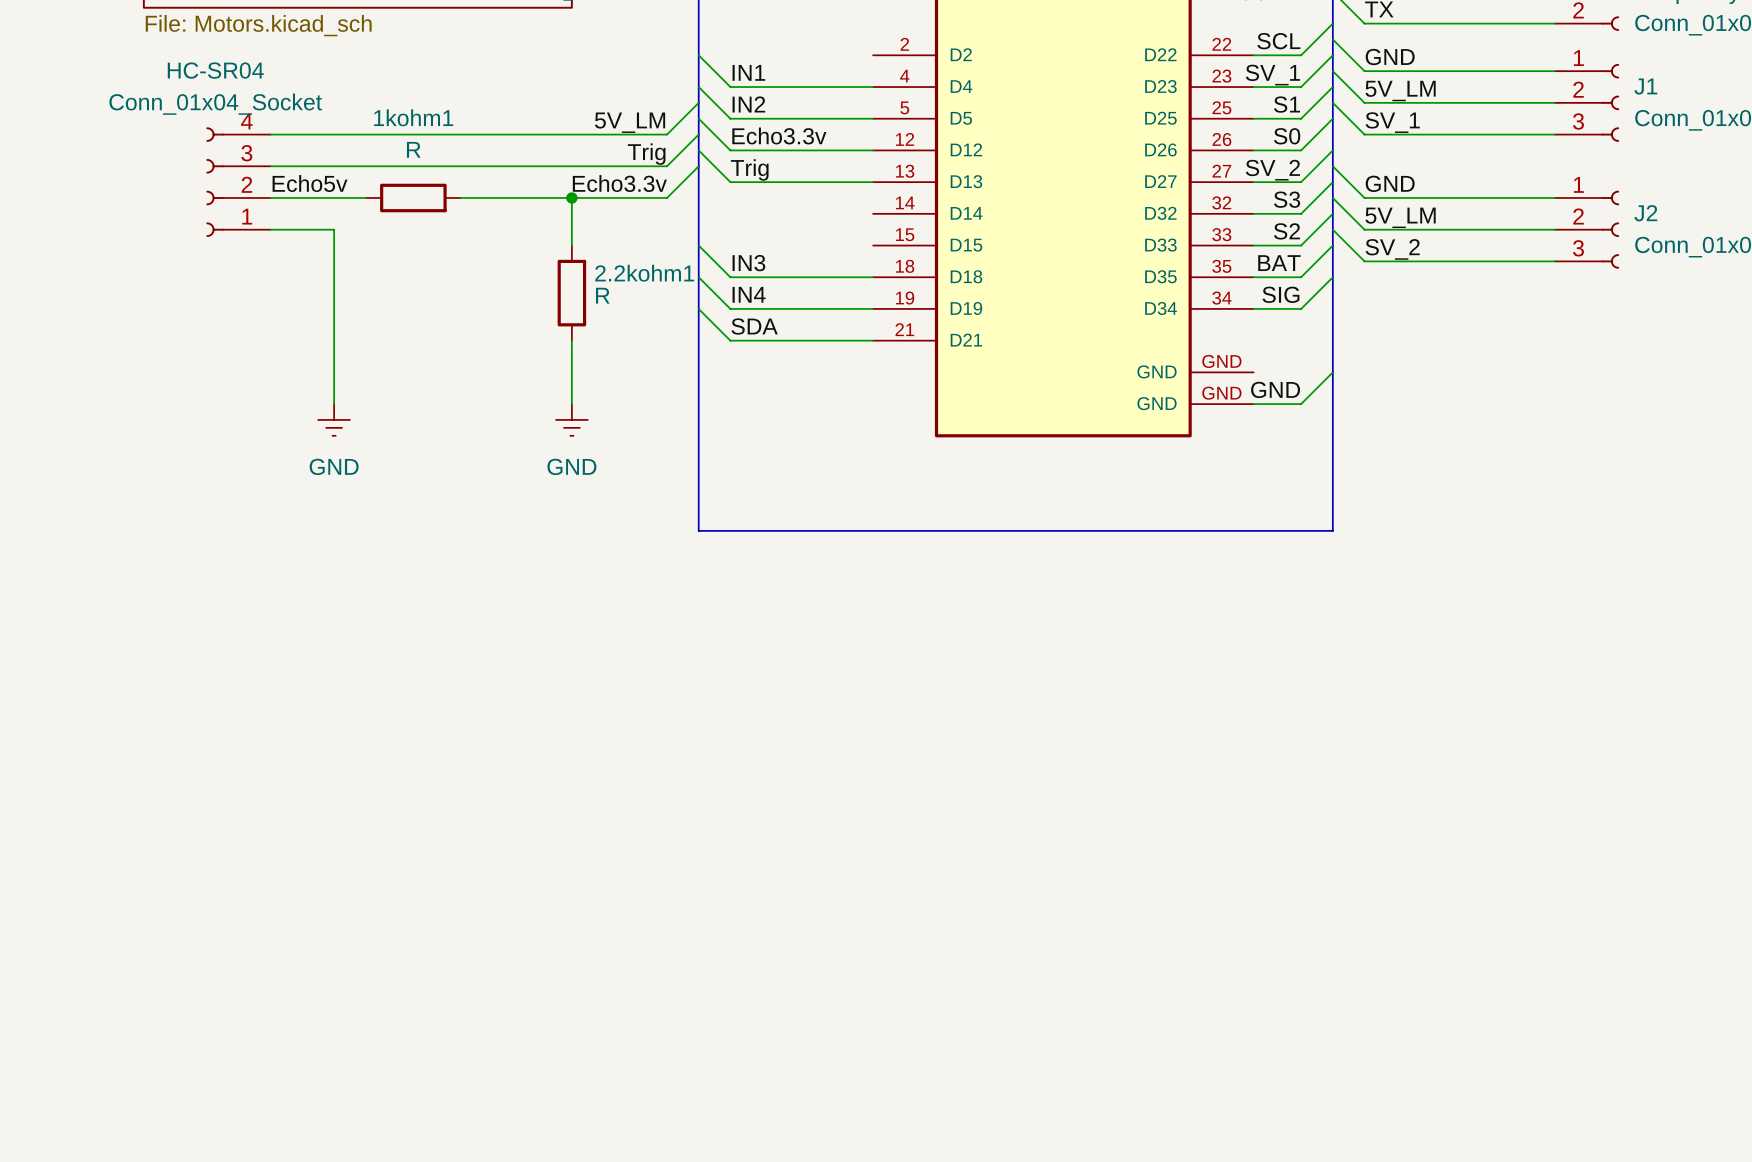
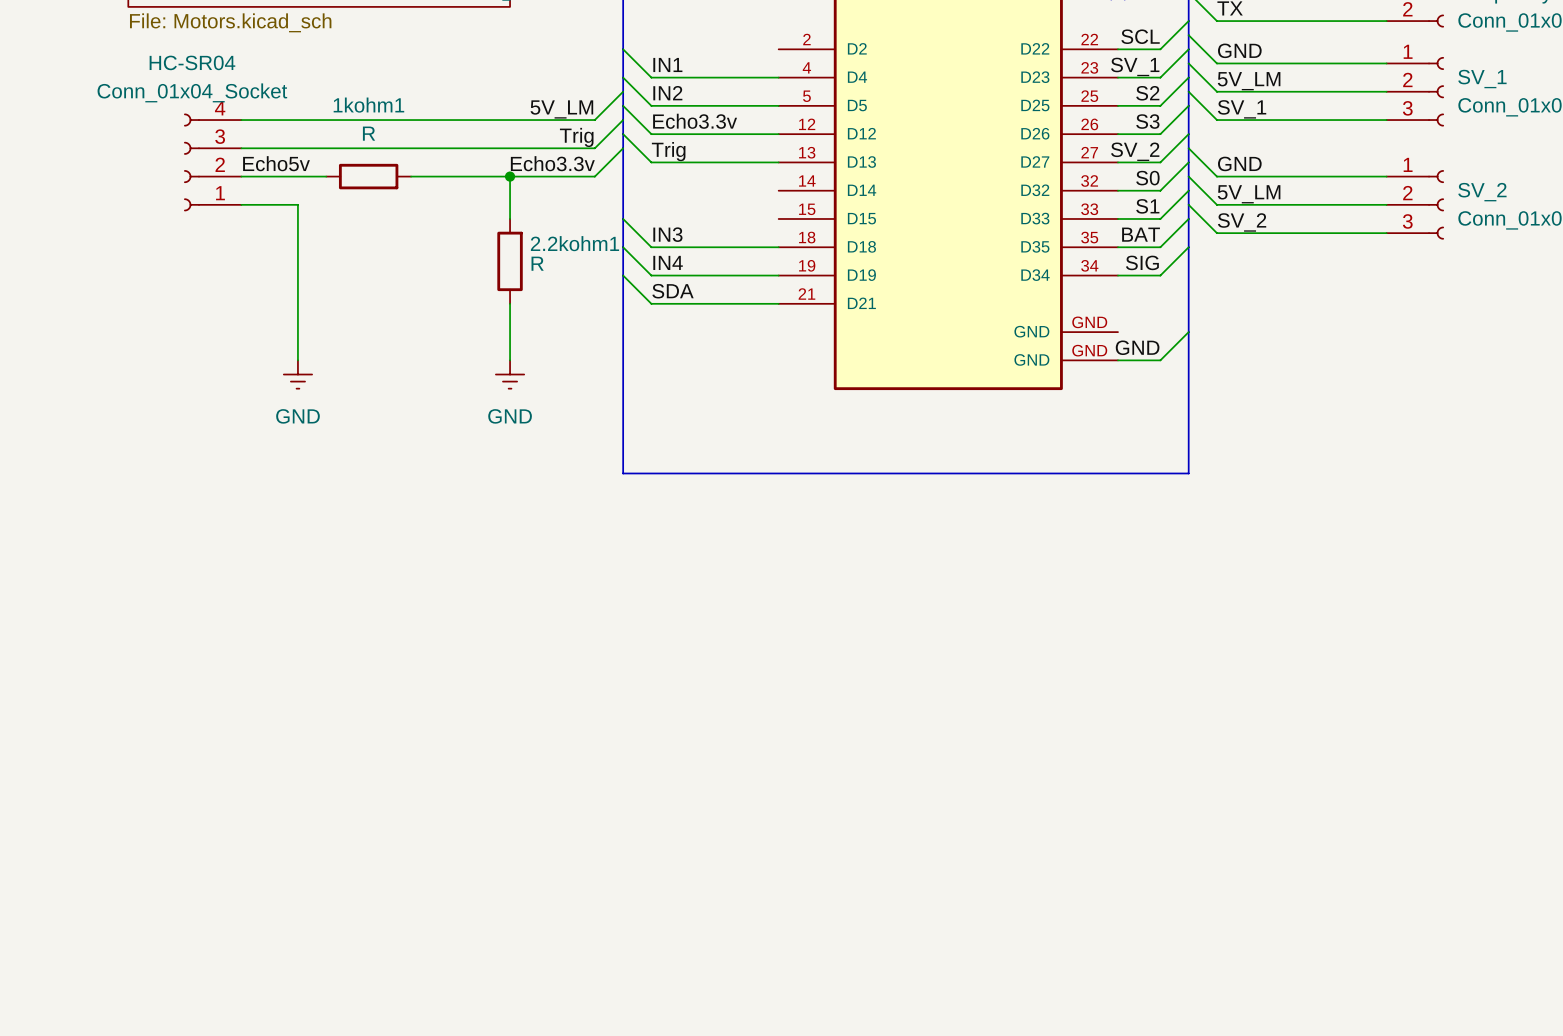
J1 name: J1 (1645, 86) -> SV_1 (1482, 79)
label: S1 (1287, 104) -> S2 (1147, 93)
label: S0 (1287, 136) -> S3 (1147, 121)
label: S3 (1287, 199) -> S0 (1147, 178)
J2 name: J2 (1645, 213) -> SV_2 (1482, 192)
label: S2 (1286, 231) -> S1 (1147, 206)

